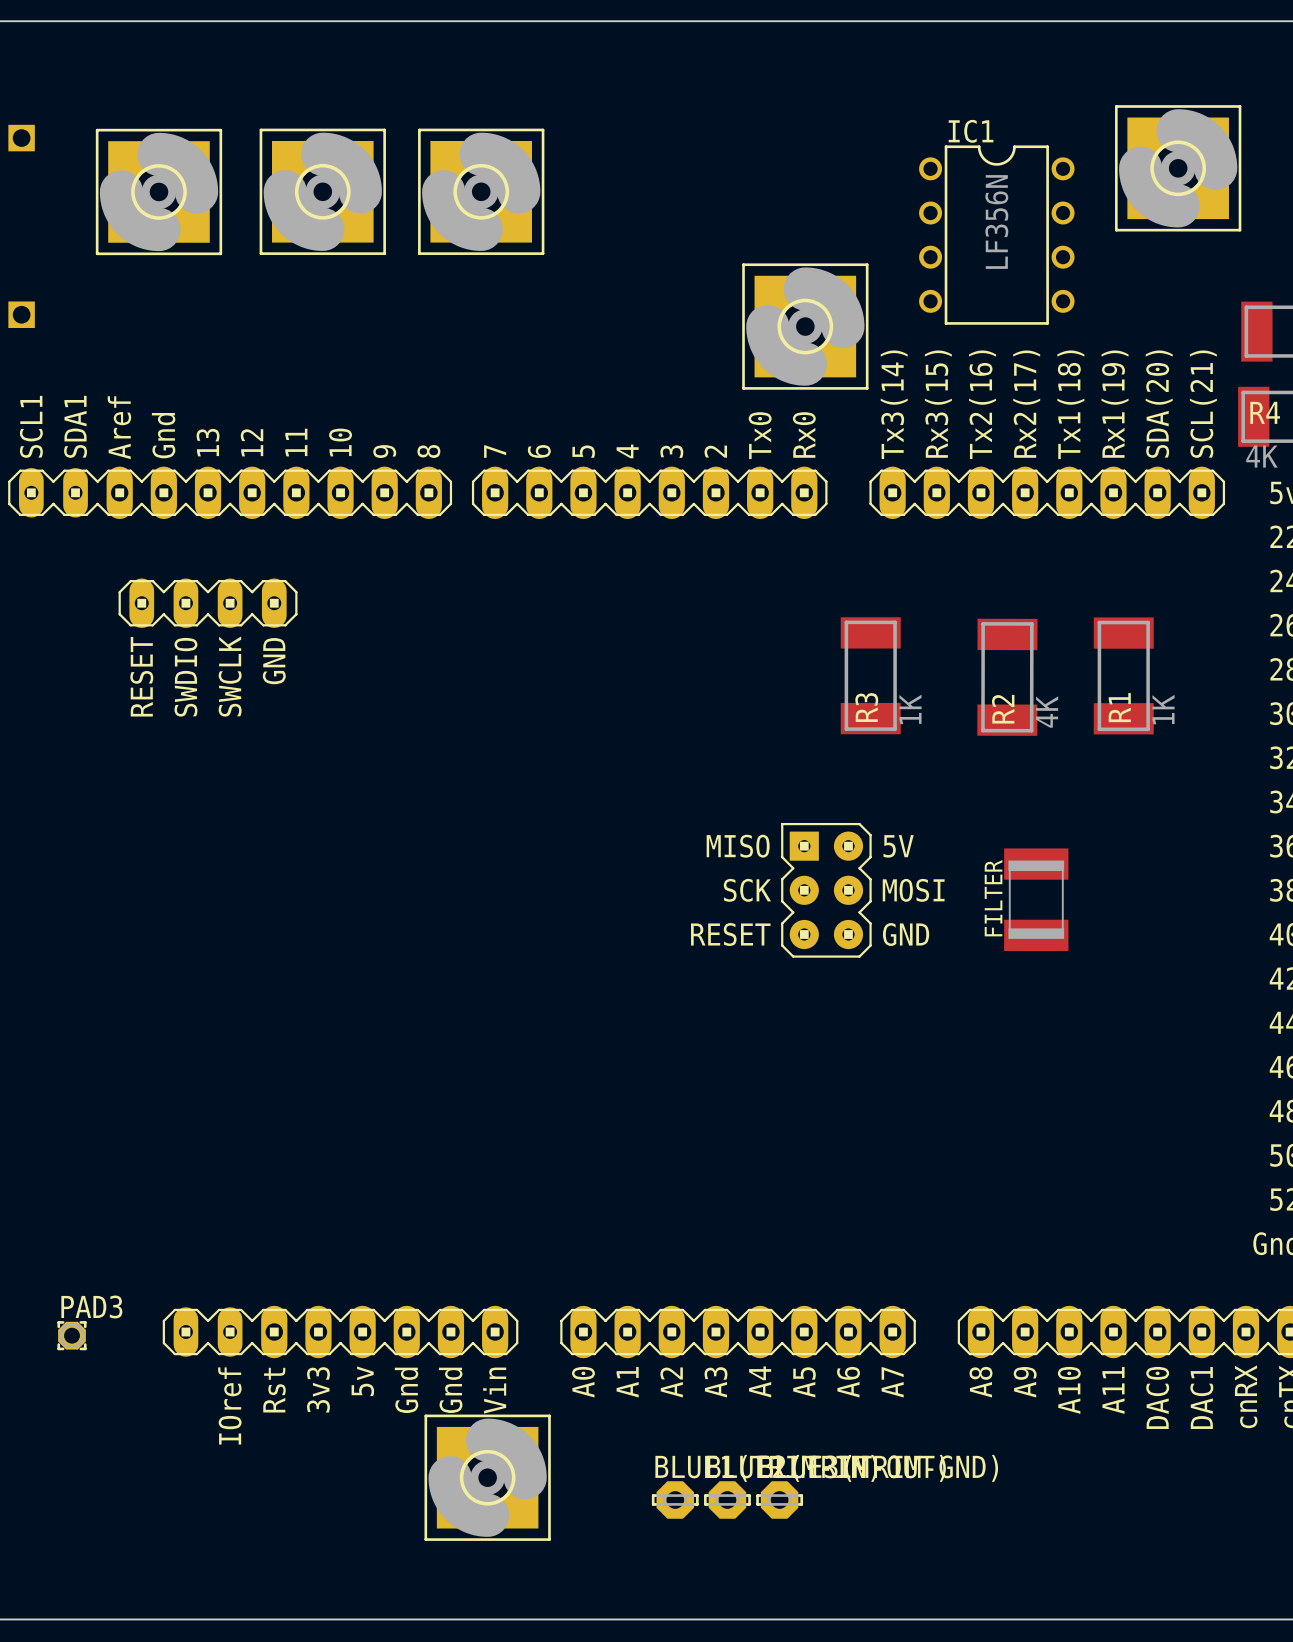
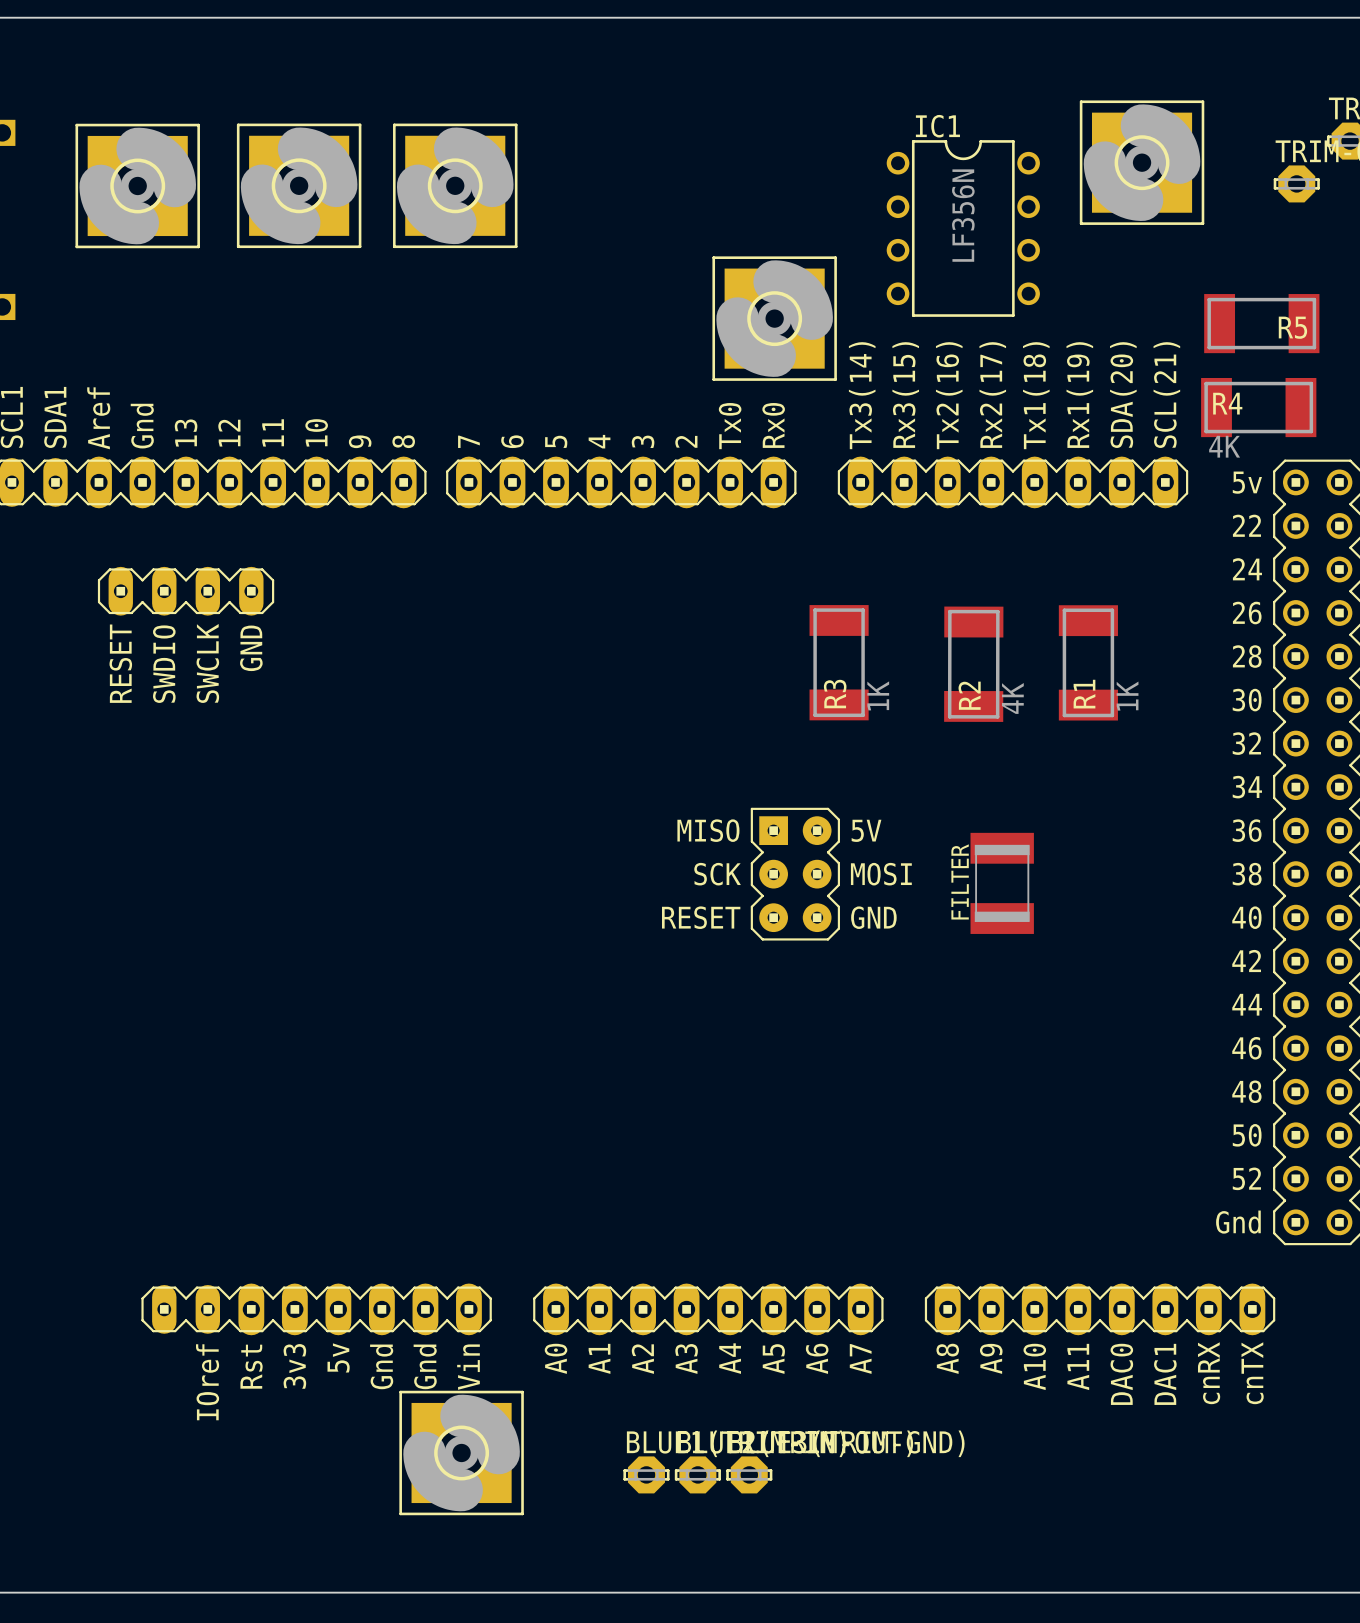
PAD3: (72, 1335) -> none

